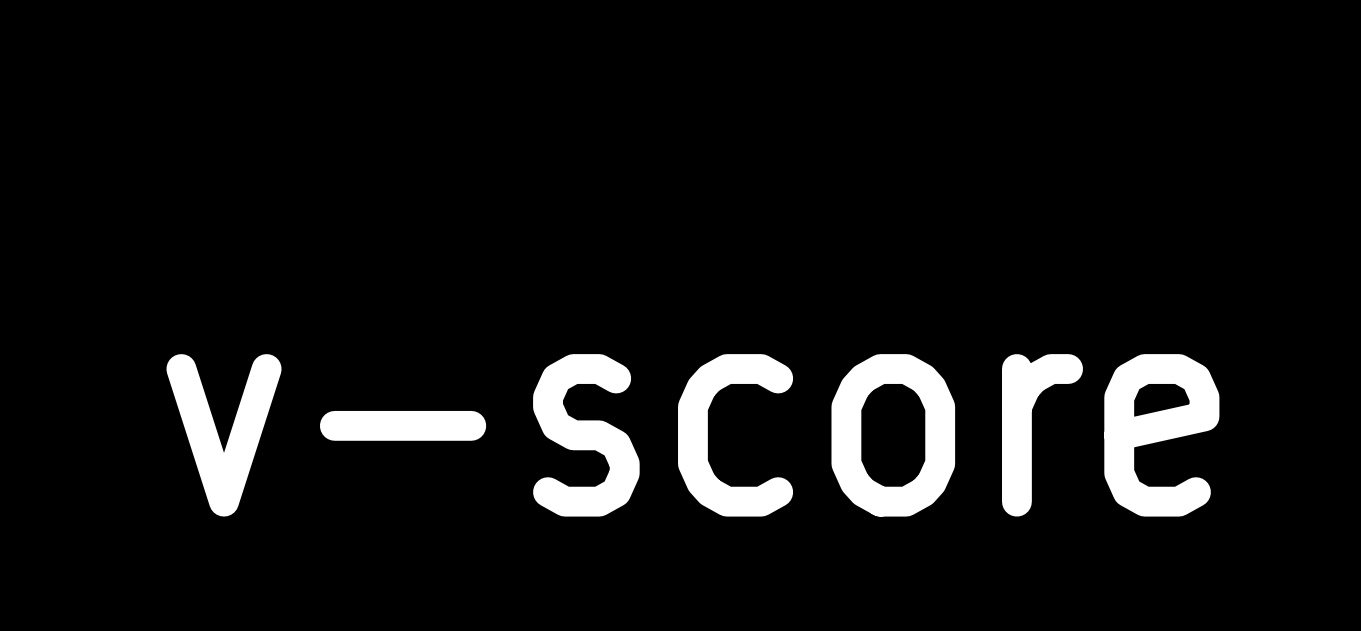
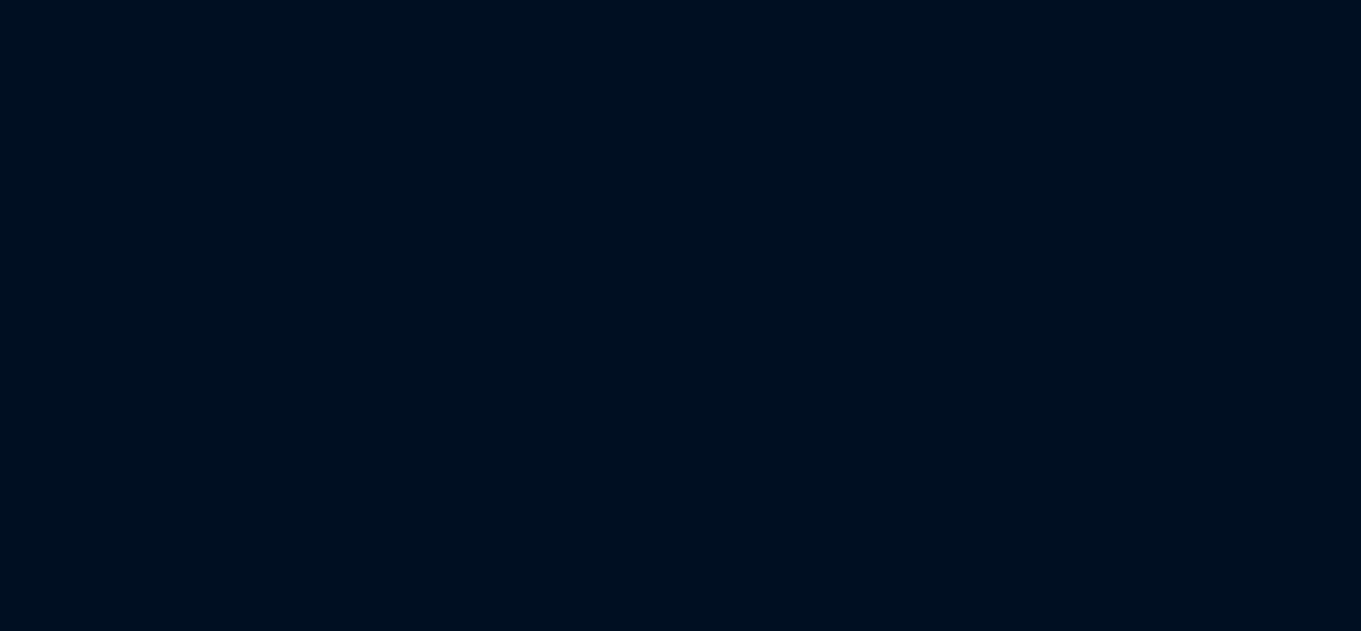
text: v-score (692, 435) -> none

